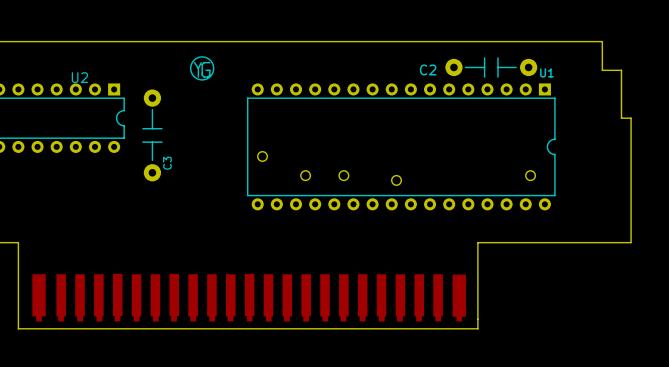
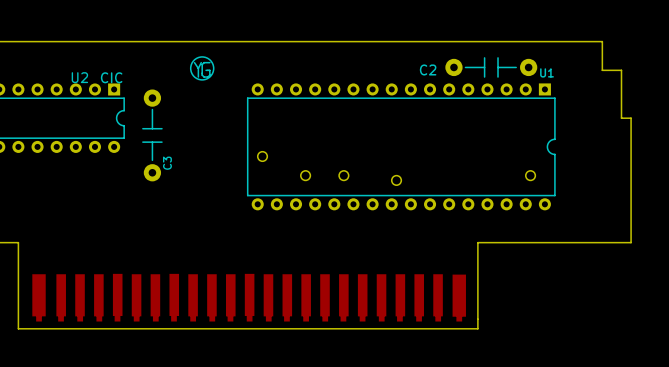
text: none -> CIC (111, 77)

